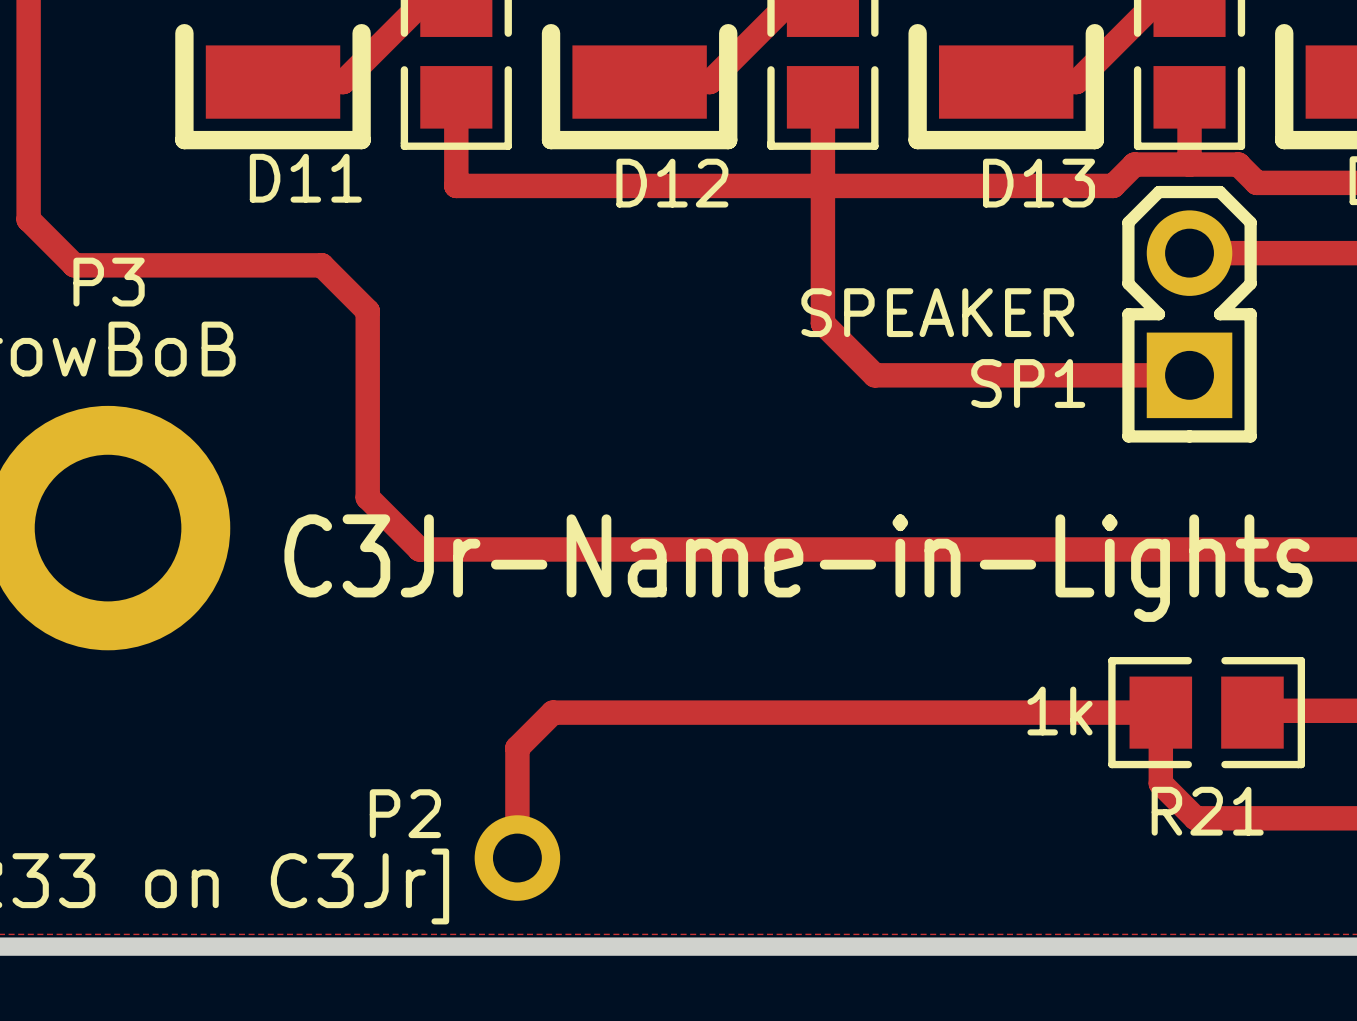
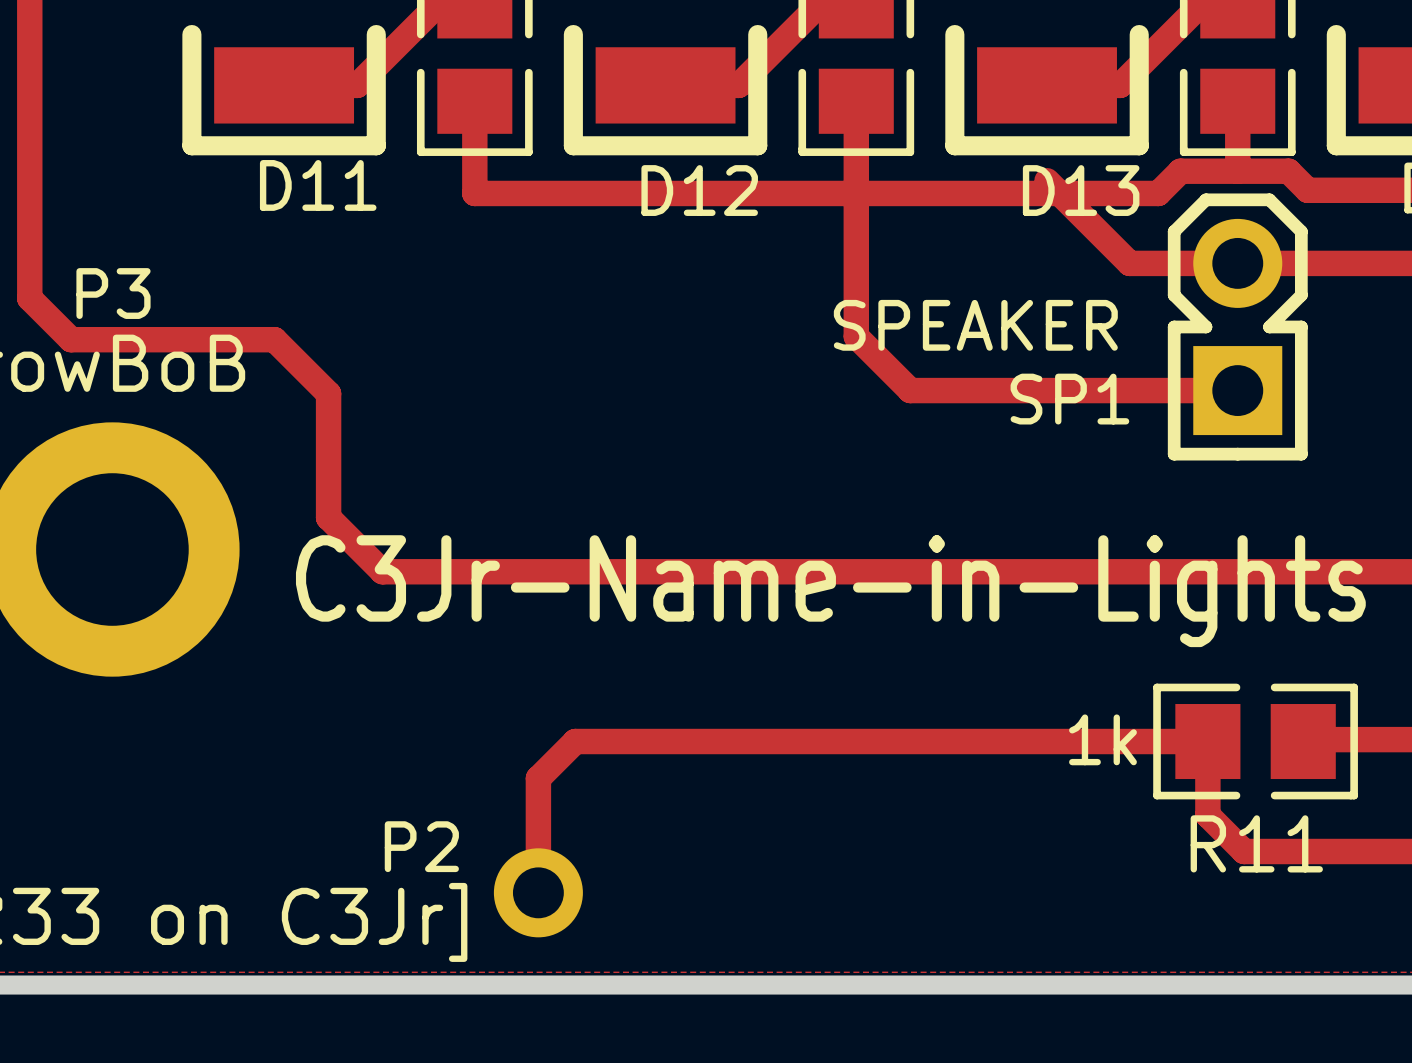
track: none -> (1047, 180) (1129, 263) (1237, 263)
track: (28, 219) (74, 265) (321, 265) (367, 311) (367, 497) (419, 549) -> (29, 228) (29, 298) (71, 339) (274, 339) (328, 393) (328, 517) (382, 571) (436, 571)
R21 name: R21 (1207, 811) -> R11 (1256, 843)

